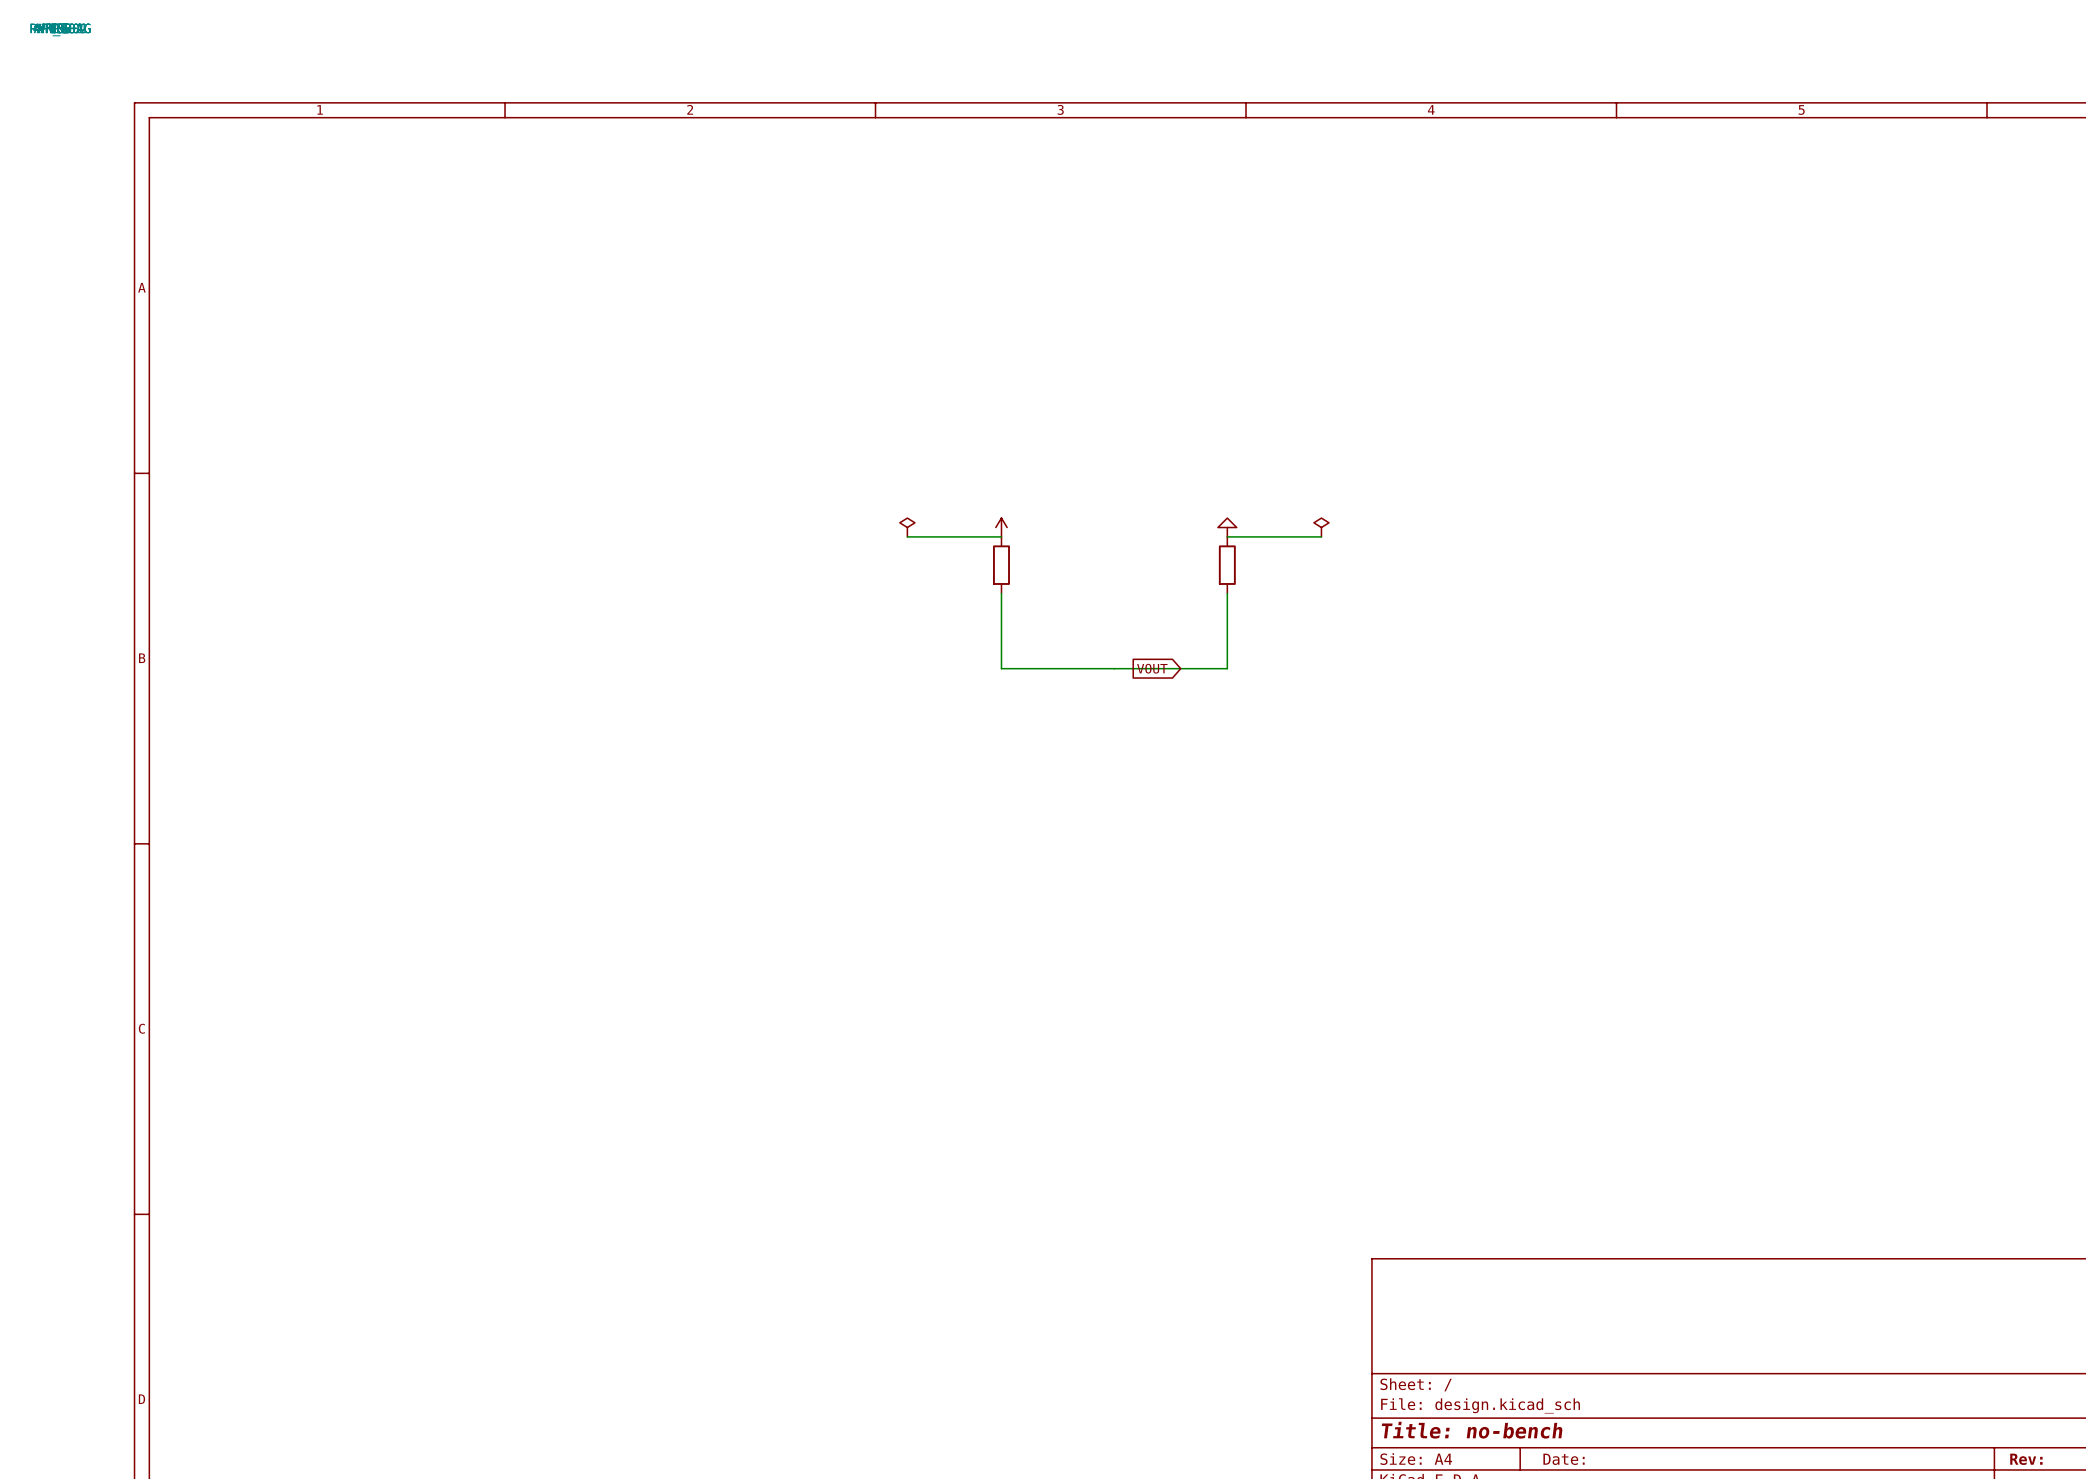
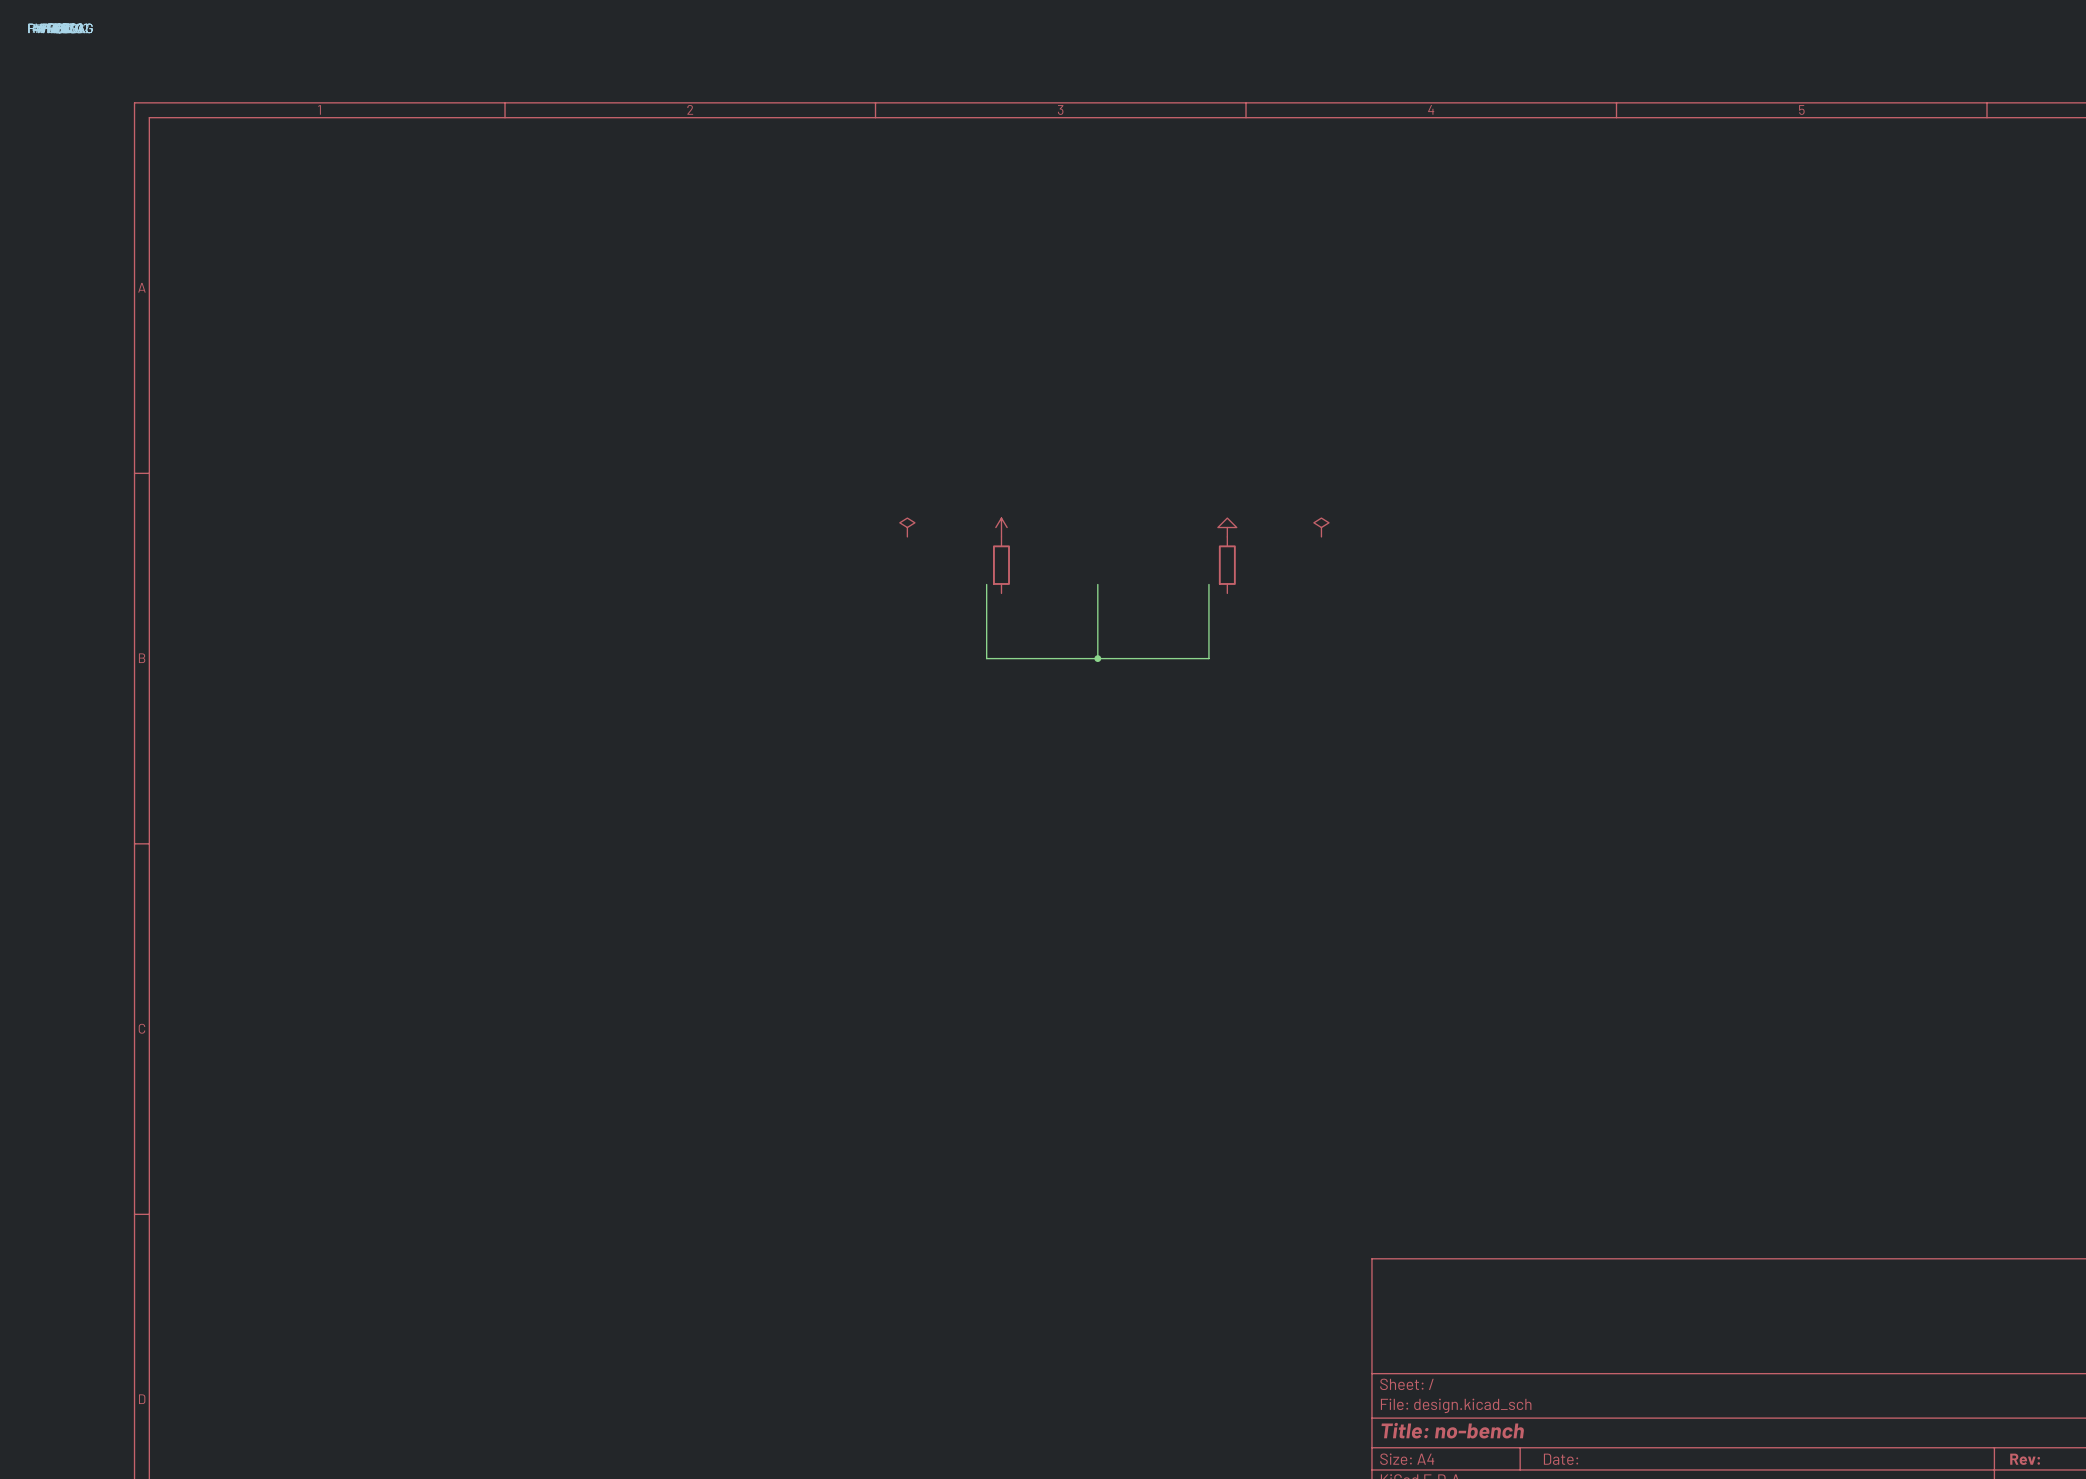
wire: (907, 536) (1001, 536) -> none
wire: (1227, 536) (1321, 536) -> none
wire: none -> (986, 584) (986, 658) (1208, 658) (1208, 584)
wire: none -> (1097, 584) (1097, 658)
wire: (1001, 593) (1001, 668) (1227, 668) (1227, 593) -> none
junction: none -> (1097, 658)
global label: VOUT (1152, 668) -> none

